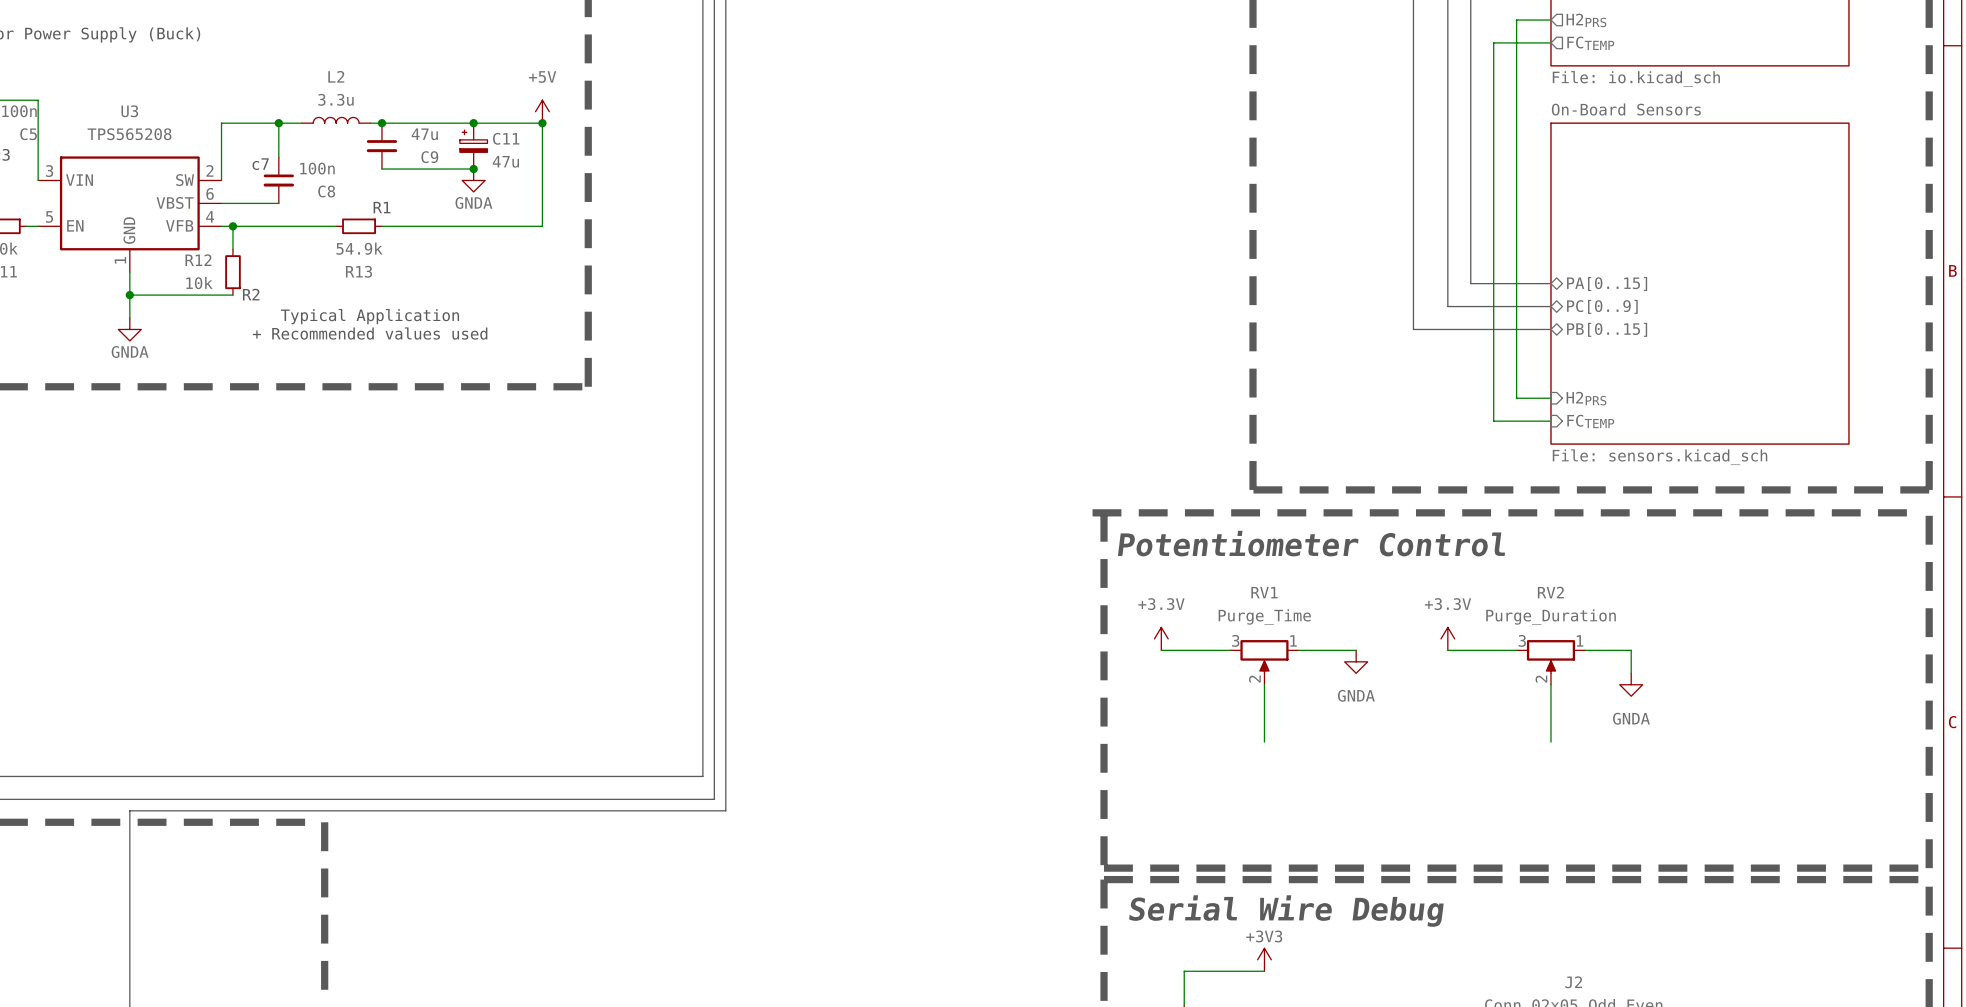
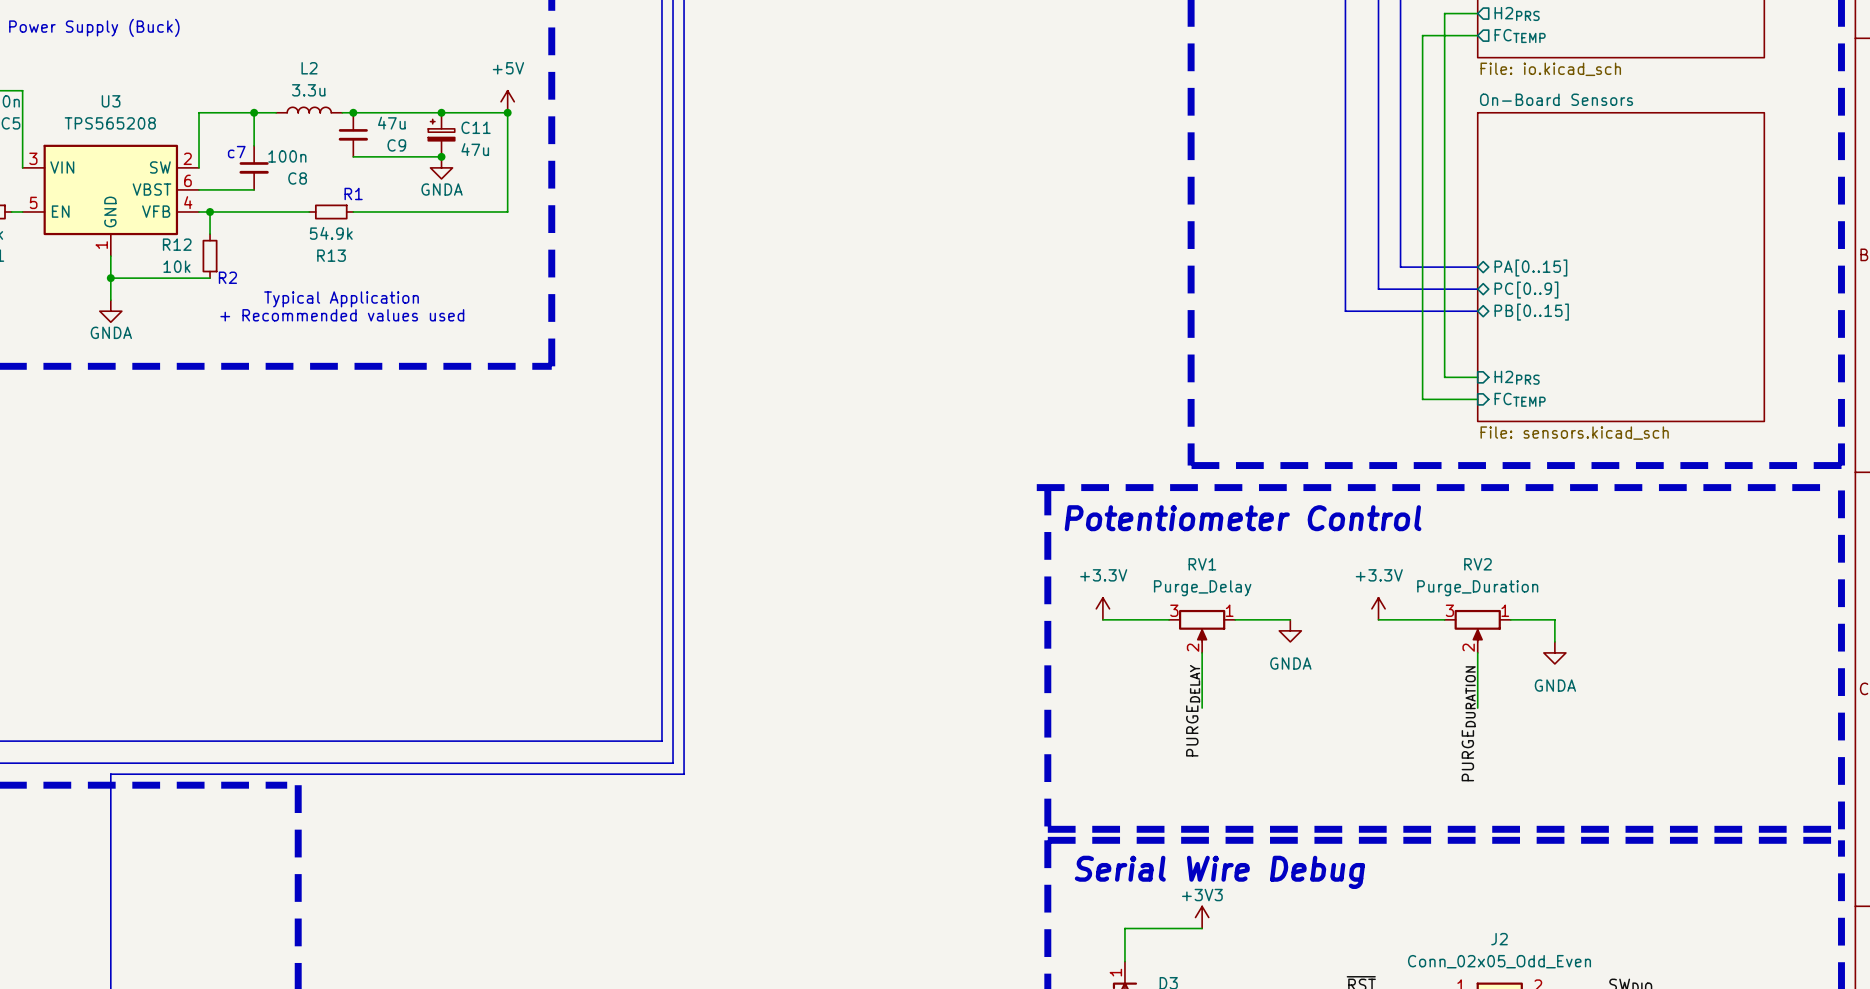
RV1 value: Purge_Time (1264, 617) -> Purge_Delay (1202, 588)
label: none -> PURGEDELAY (1193, 710)
label: none -> PURGEDURATION (1468, 723)

